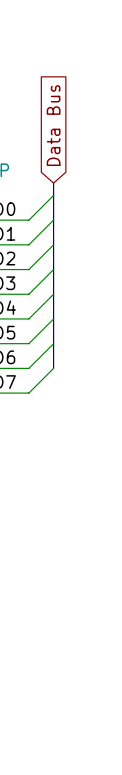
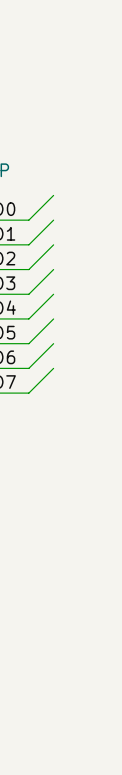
global label: Data Bus (53, 125) -> none
bus: (53, 183) (53, 368) -> none

